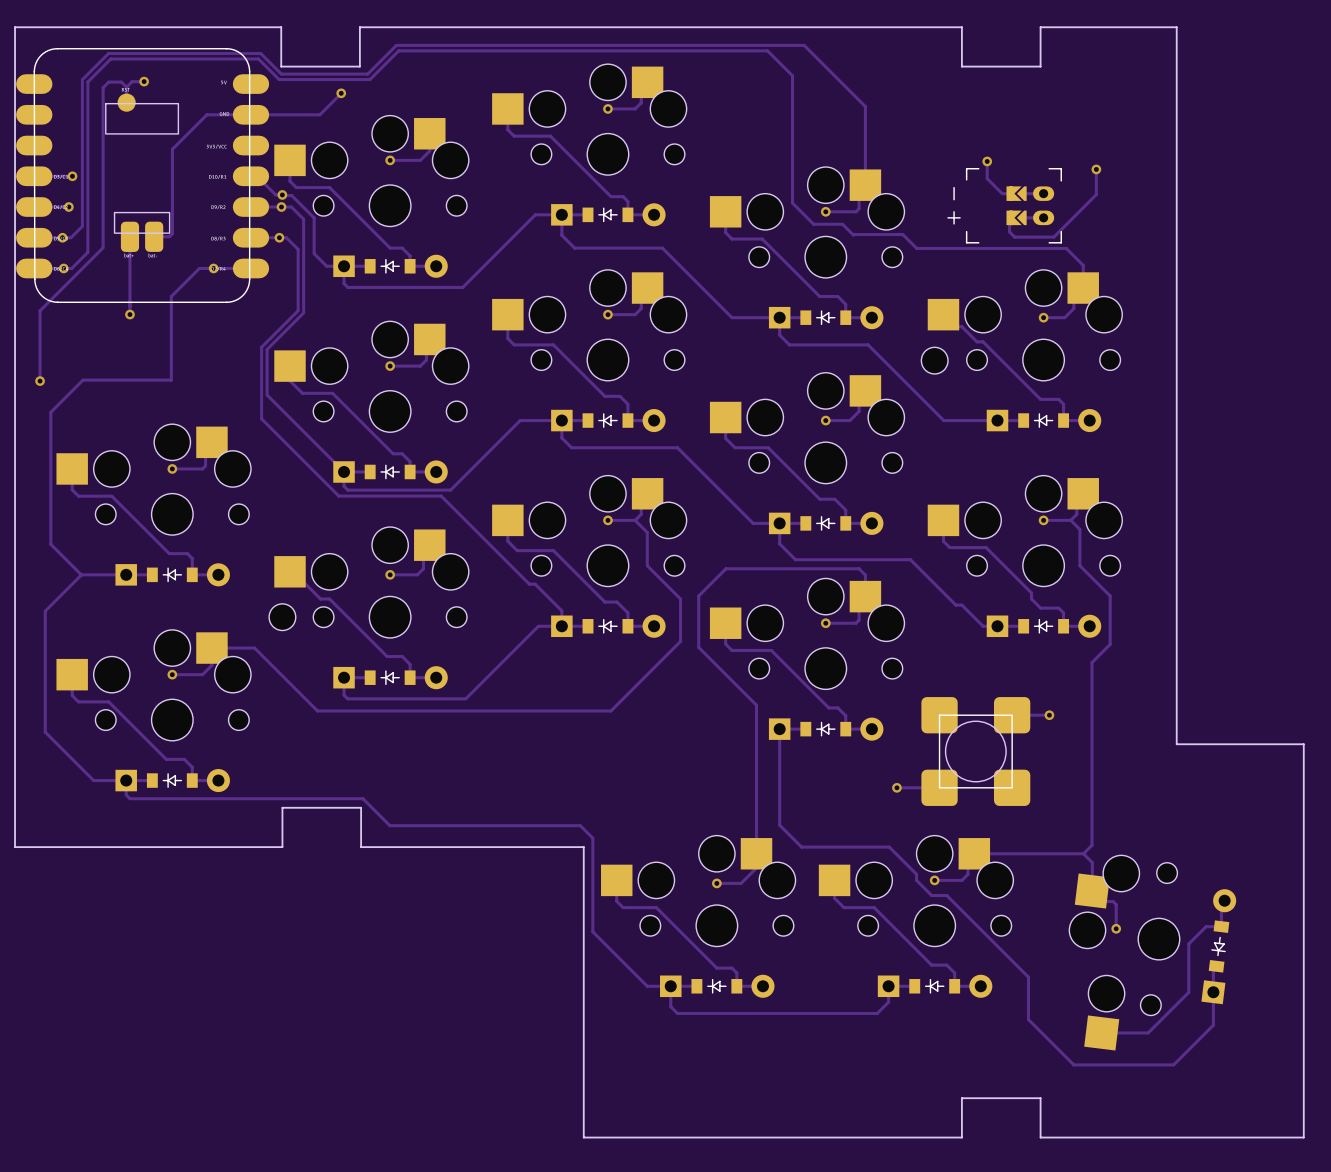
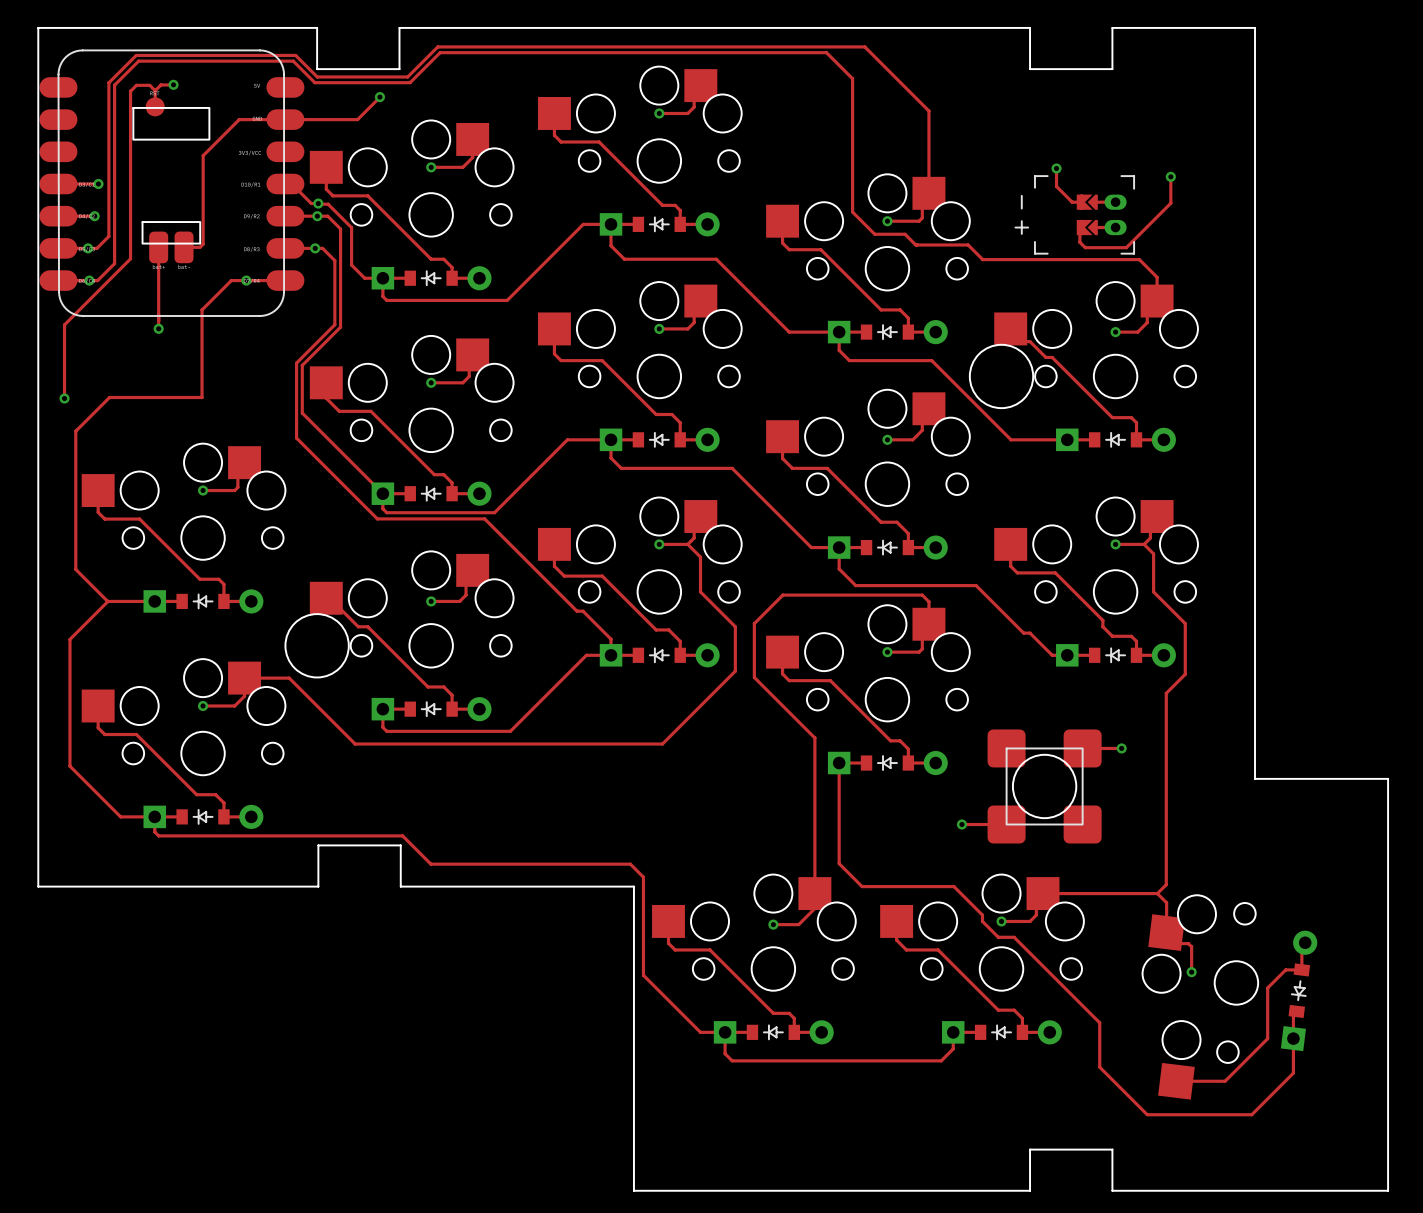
round board edge: none -> [969, 344, 1034, 409]
part: (934, 360) -> none
round board edge: none -> [284, 613, 350, 679]
part: (282, 617) -> none

